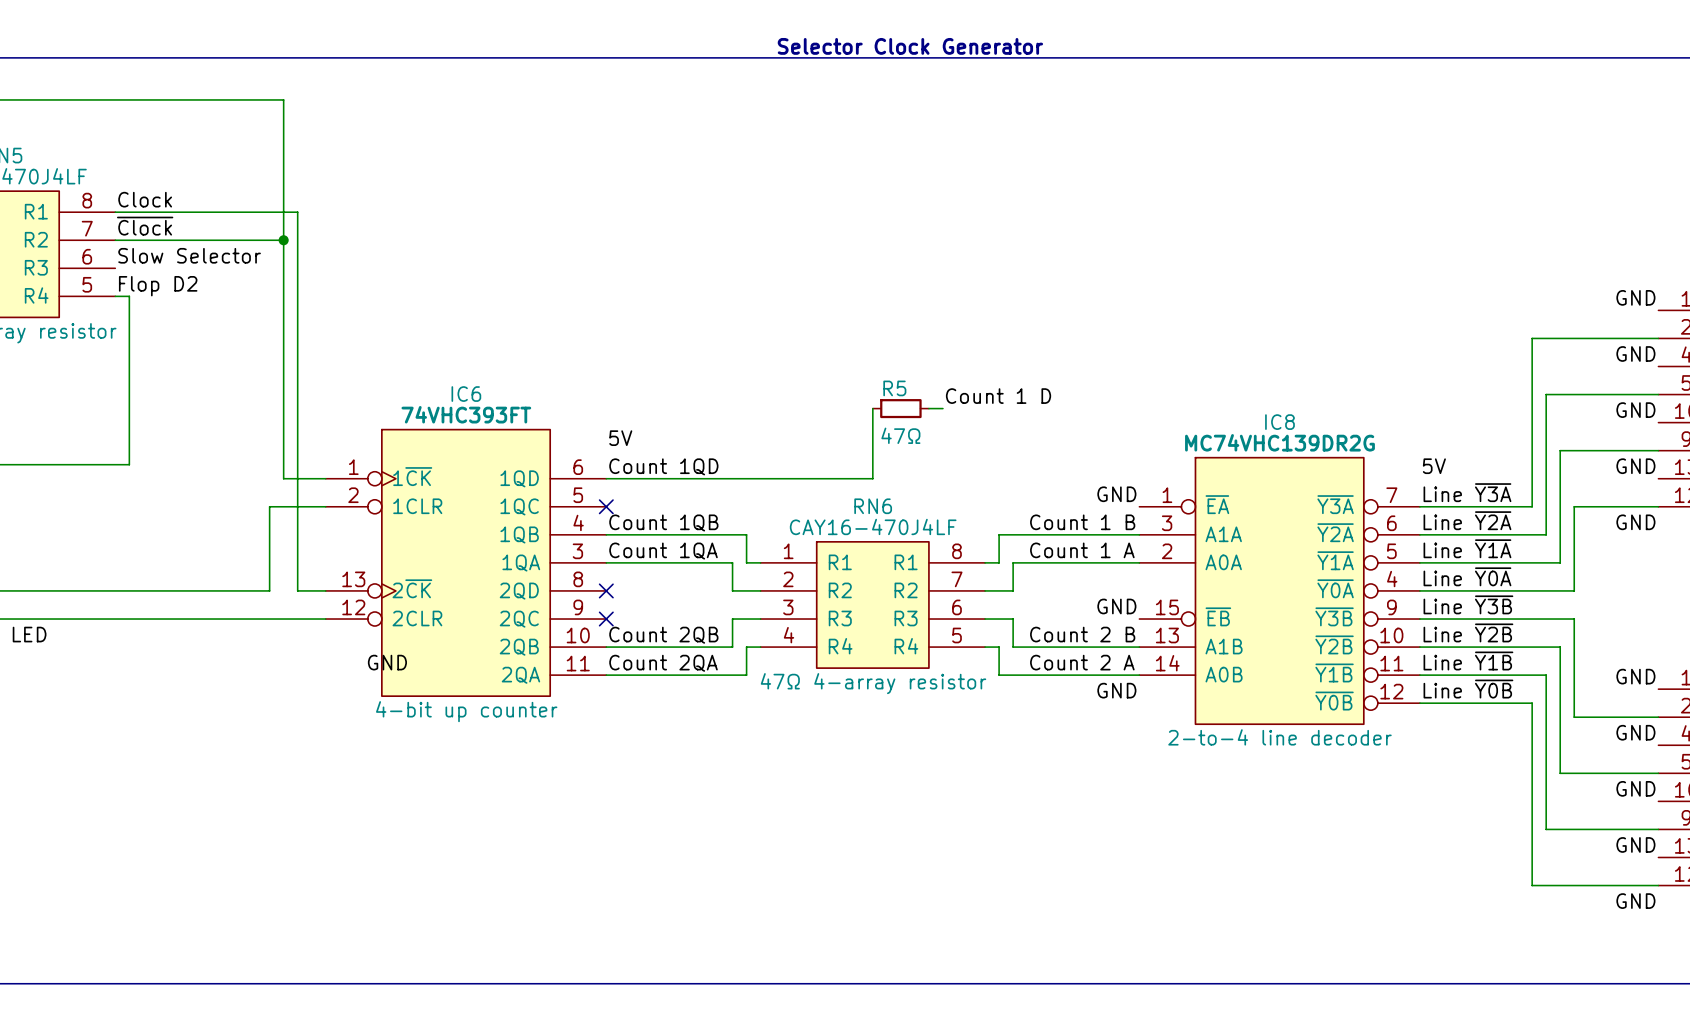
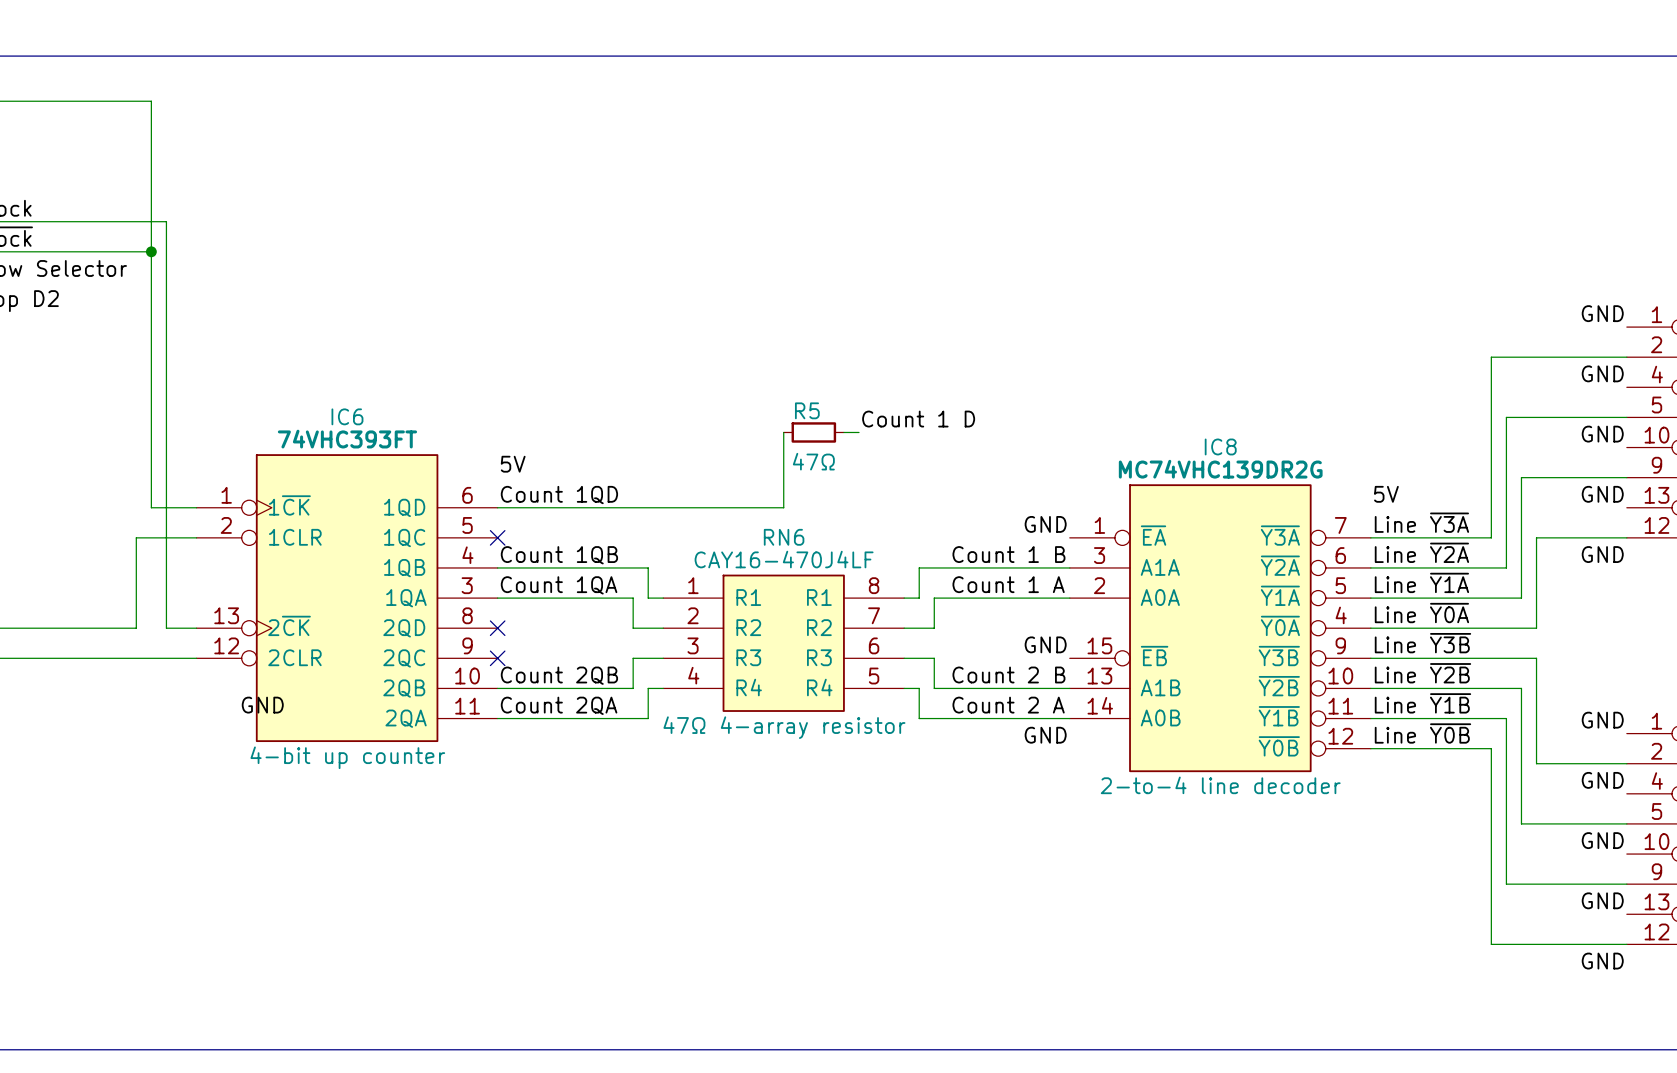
text: Selector Clock Generator (910, 46) -> none

